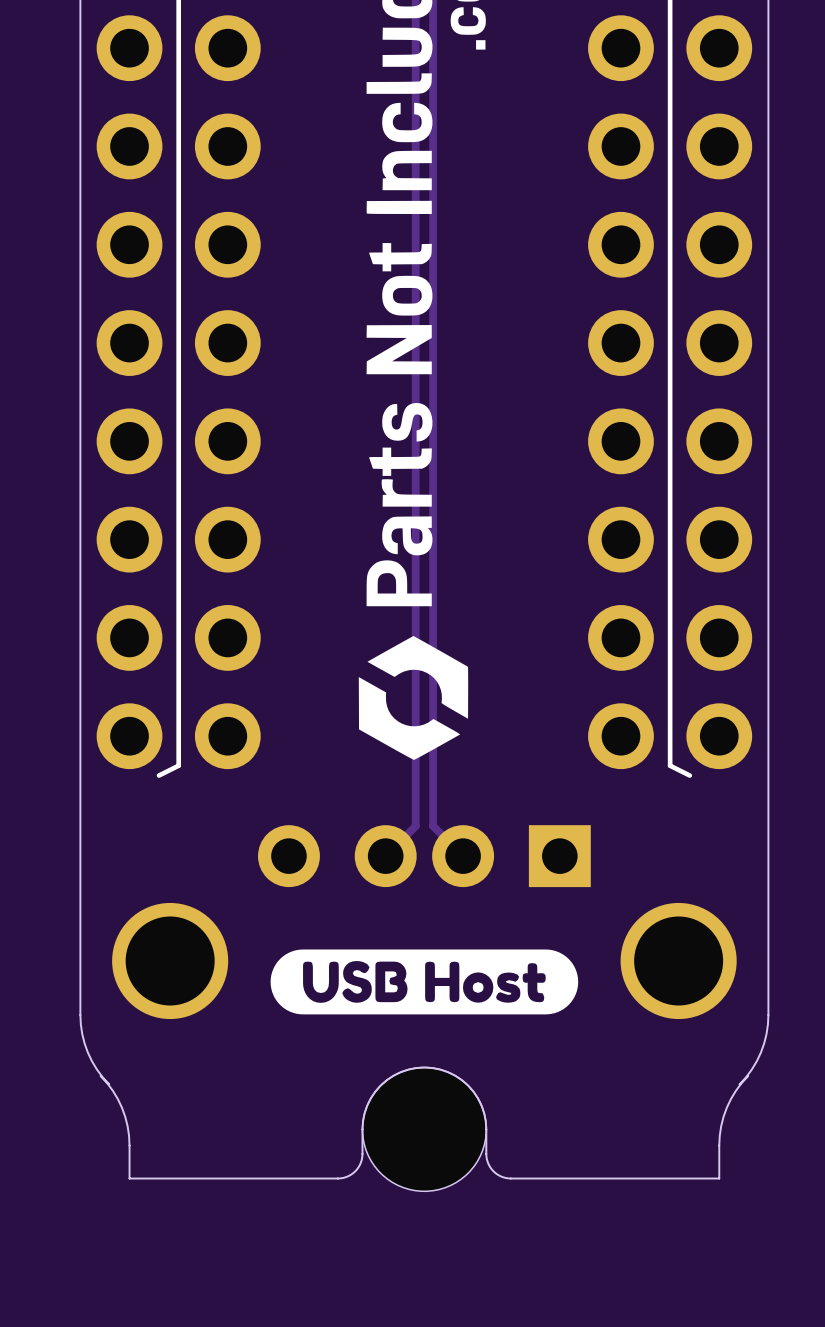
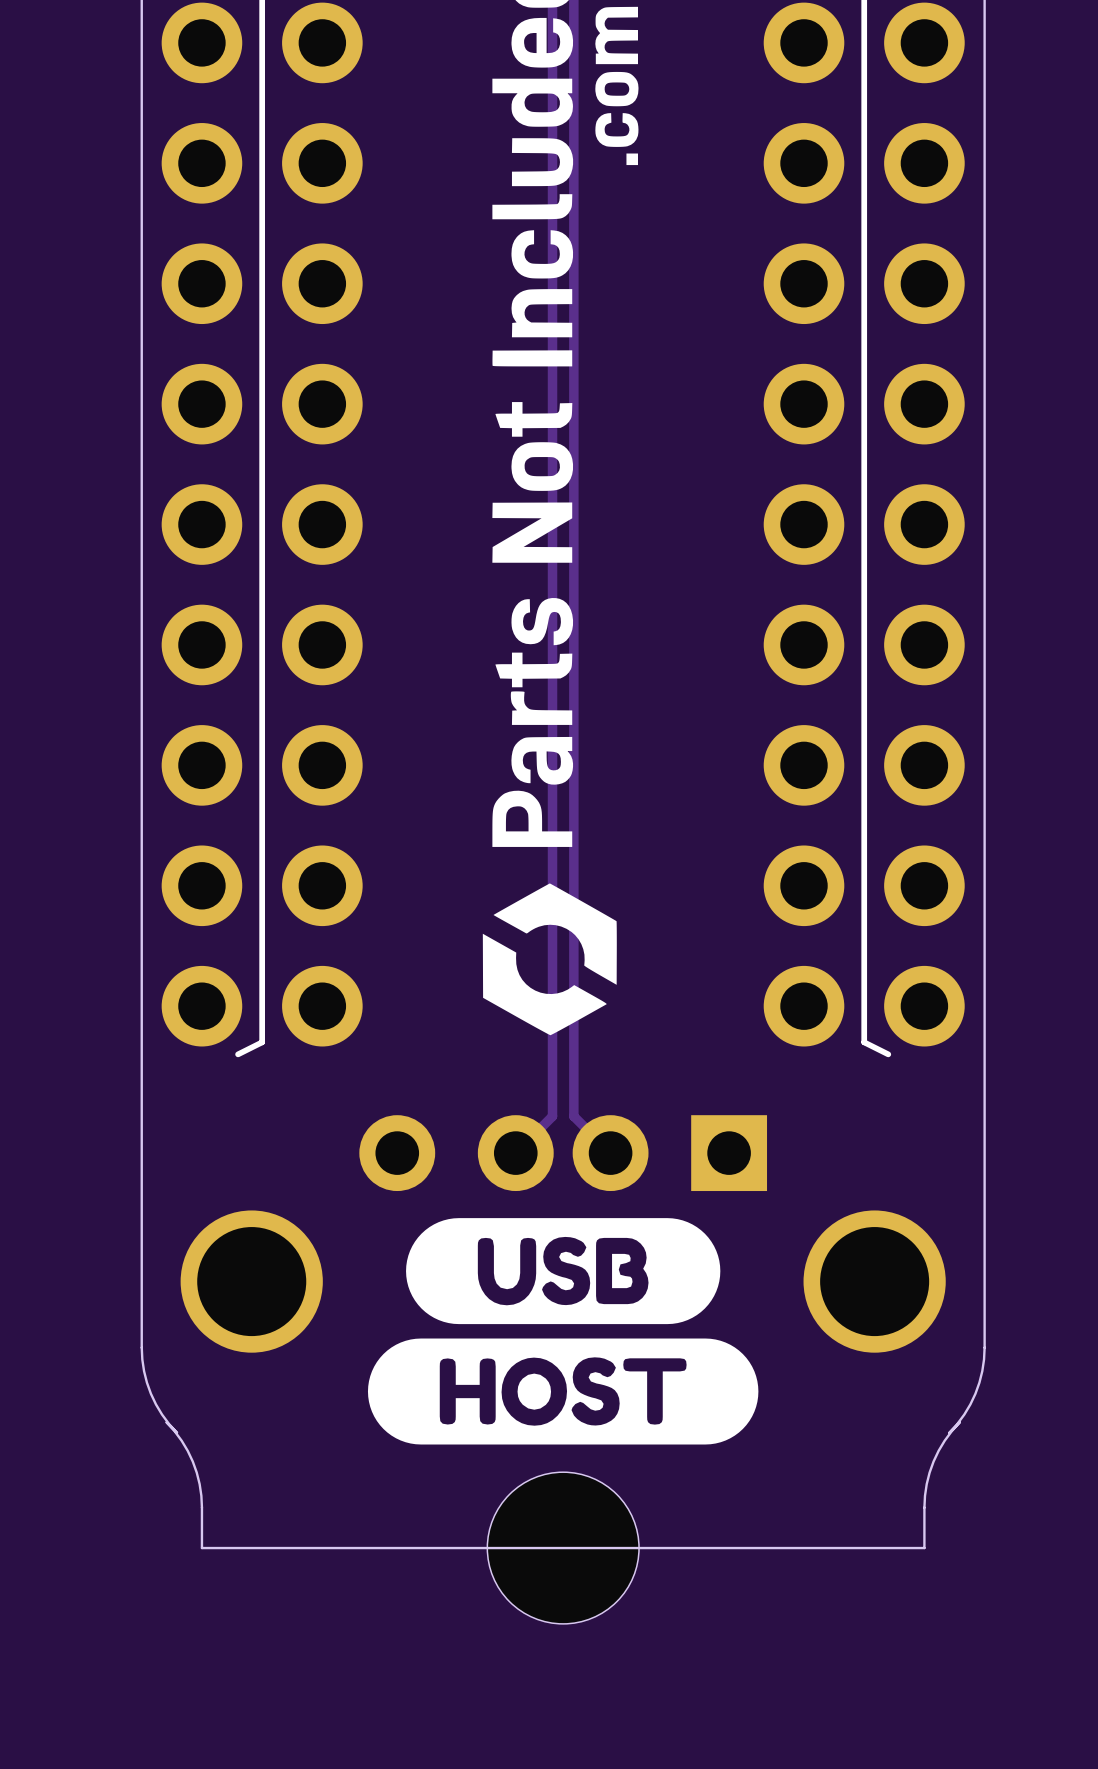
drawing shape: [270, 949, 579, 1015] -> [406, 1218, 721, 1325]
drawing: none -> [367, 1338, 759, 1445]
part position: (424, 1129) -> (563, 1548)
board edge: (510, 1178) (497, 1174) (488, 1164) (486, 1156) (484, 1113) (473, 1091) (455, 1075) (440, 1069) (424, 1067) (408, 1069) (393, 1075) (375, 1091) (364, 1113) (362, 1156) (360, 1164) (350, 1174) (337, 1178) -> (669, 1548) (457, 1548)

